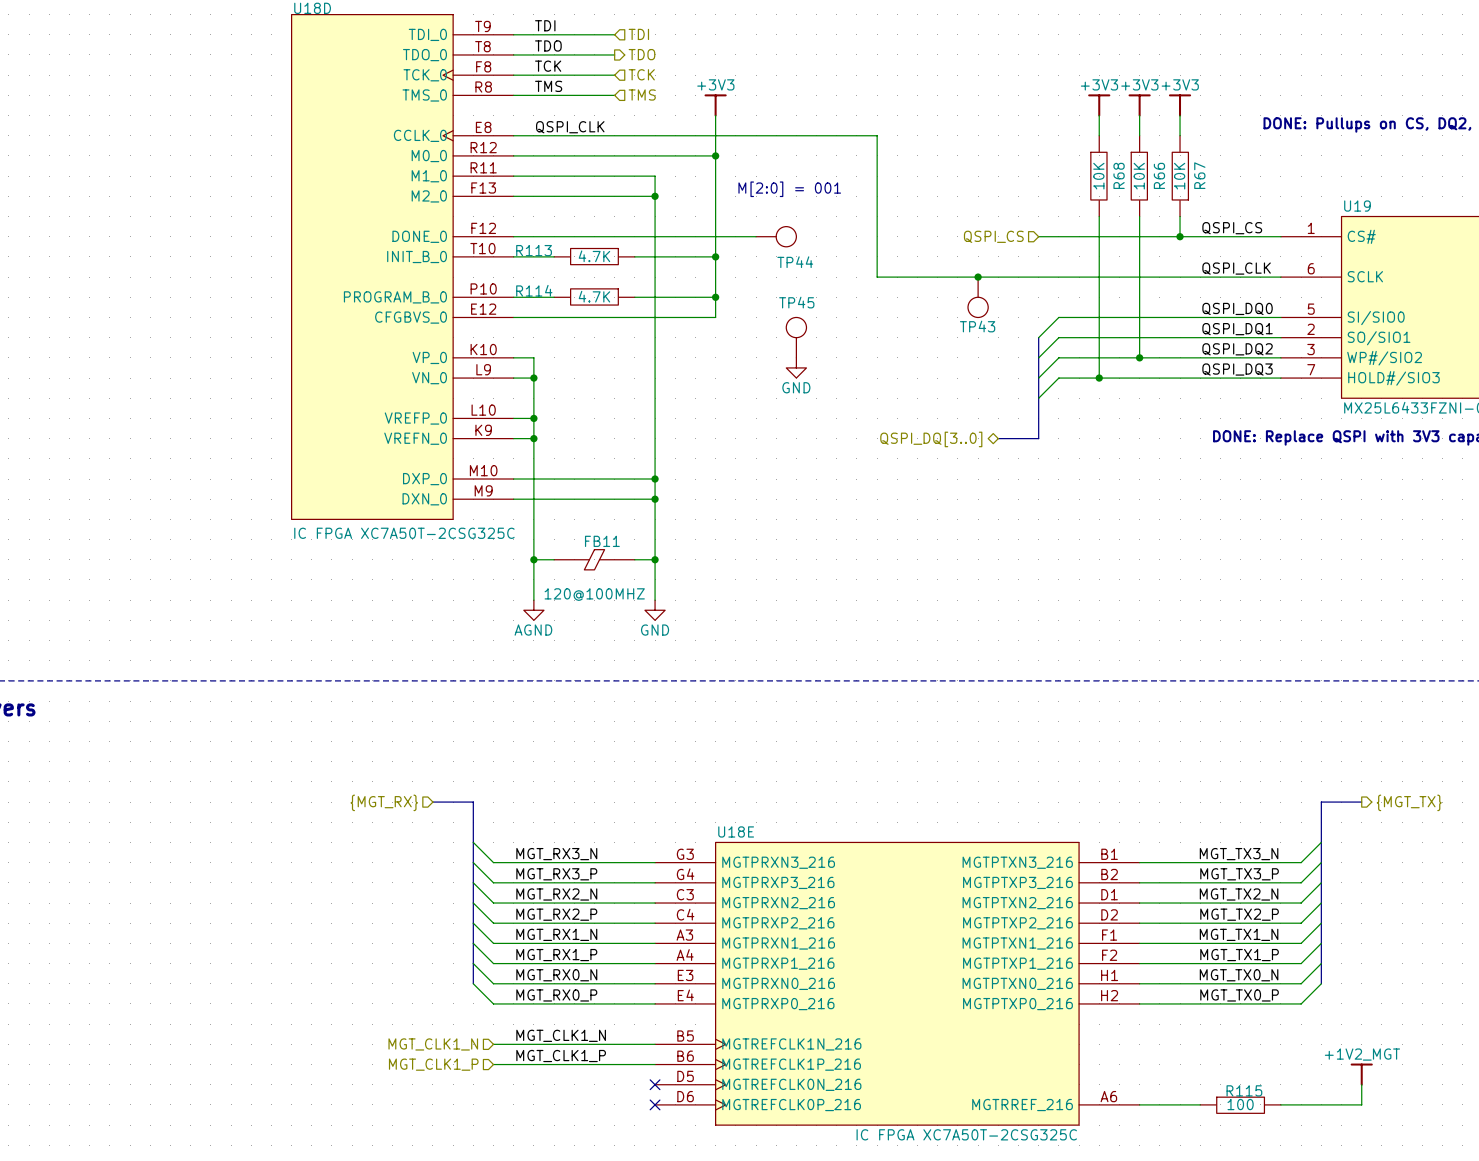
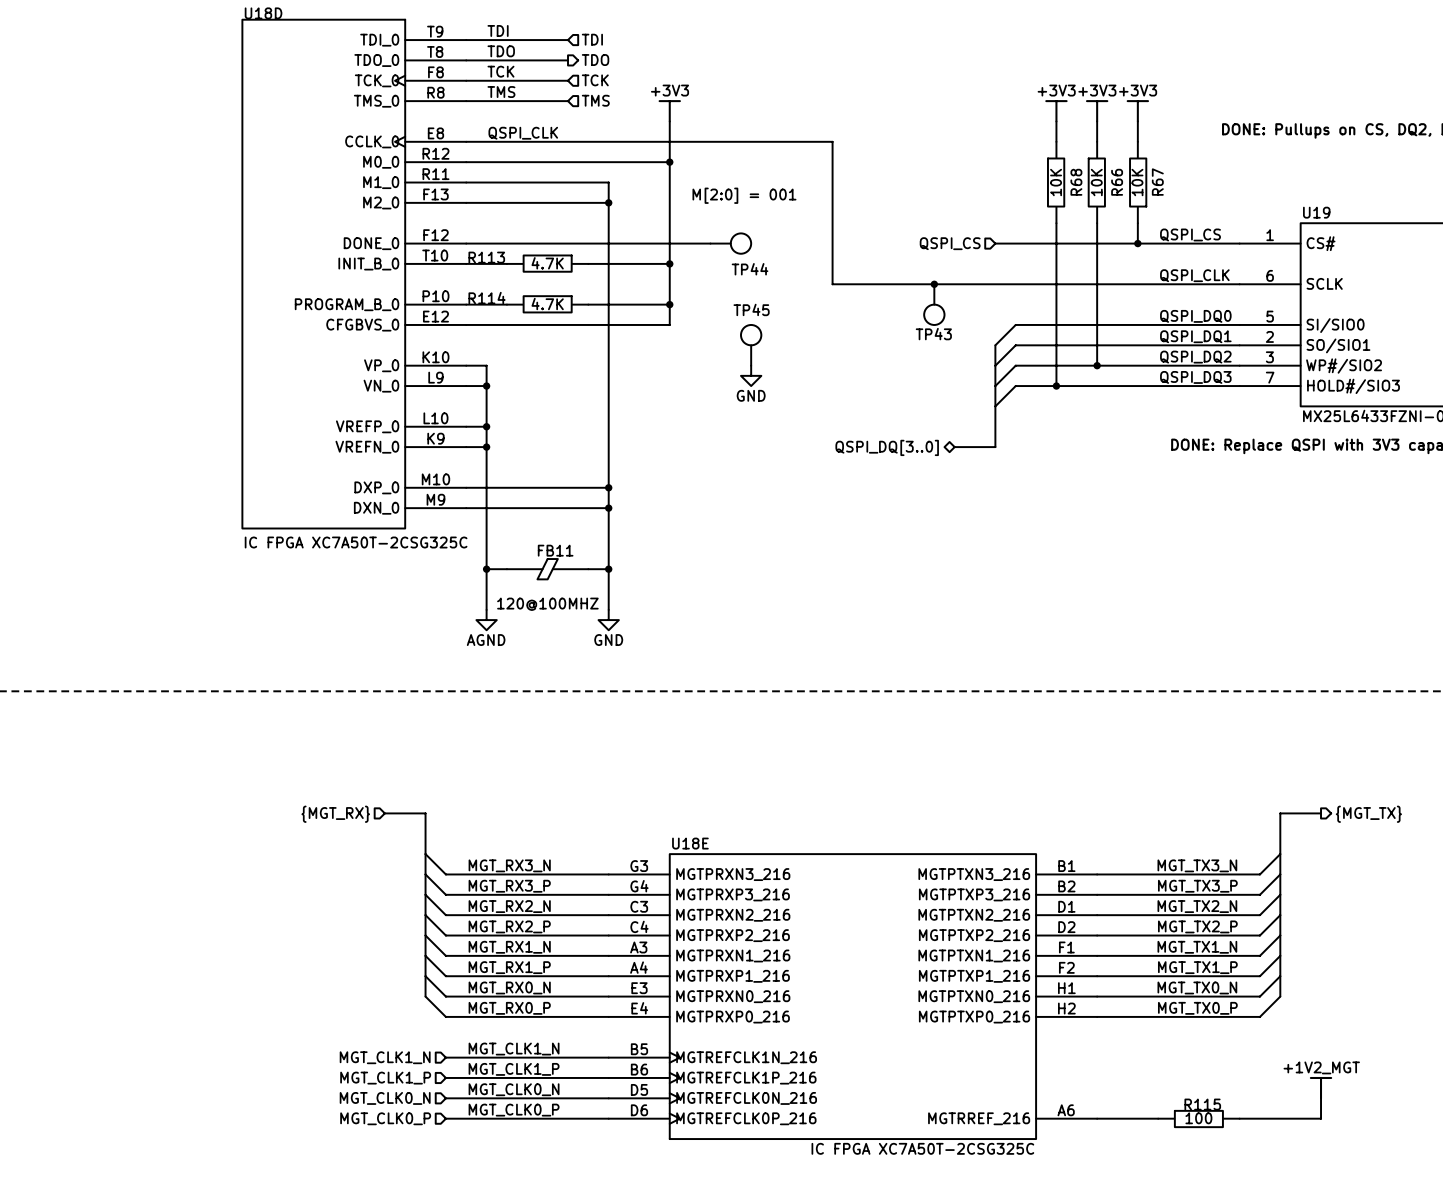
label: none -> MGT_CLK0_N (514, 1089)
hierarchical label: none -> MGT_CLK0_N (385, 1098)
wire: none -> (445, 1098) (608, 1098)
no-connect mark: (655, 1084) -> none
label: none -> MGT_CLK0_P (514, 1110)
wire: none -> (445, 1118) (608, 1118)
no-connect mark: (655, 1104) -> none
hierarchical label: none -> MGT_CLK0_P (385, 1118)

